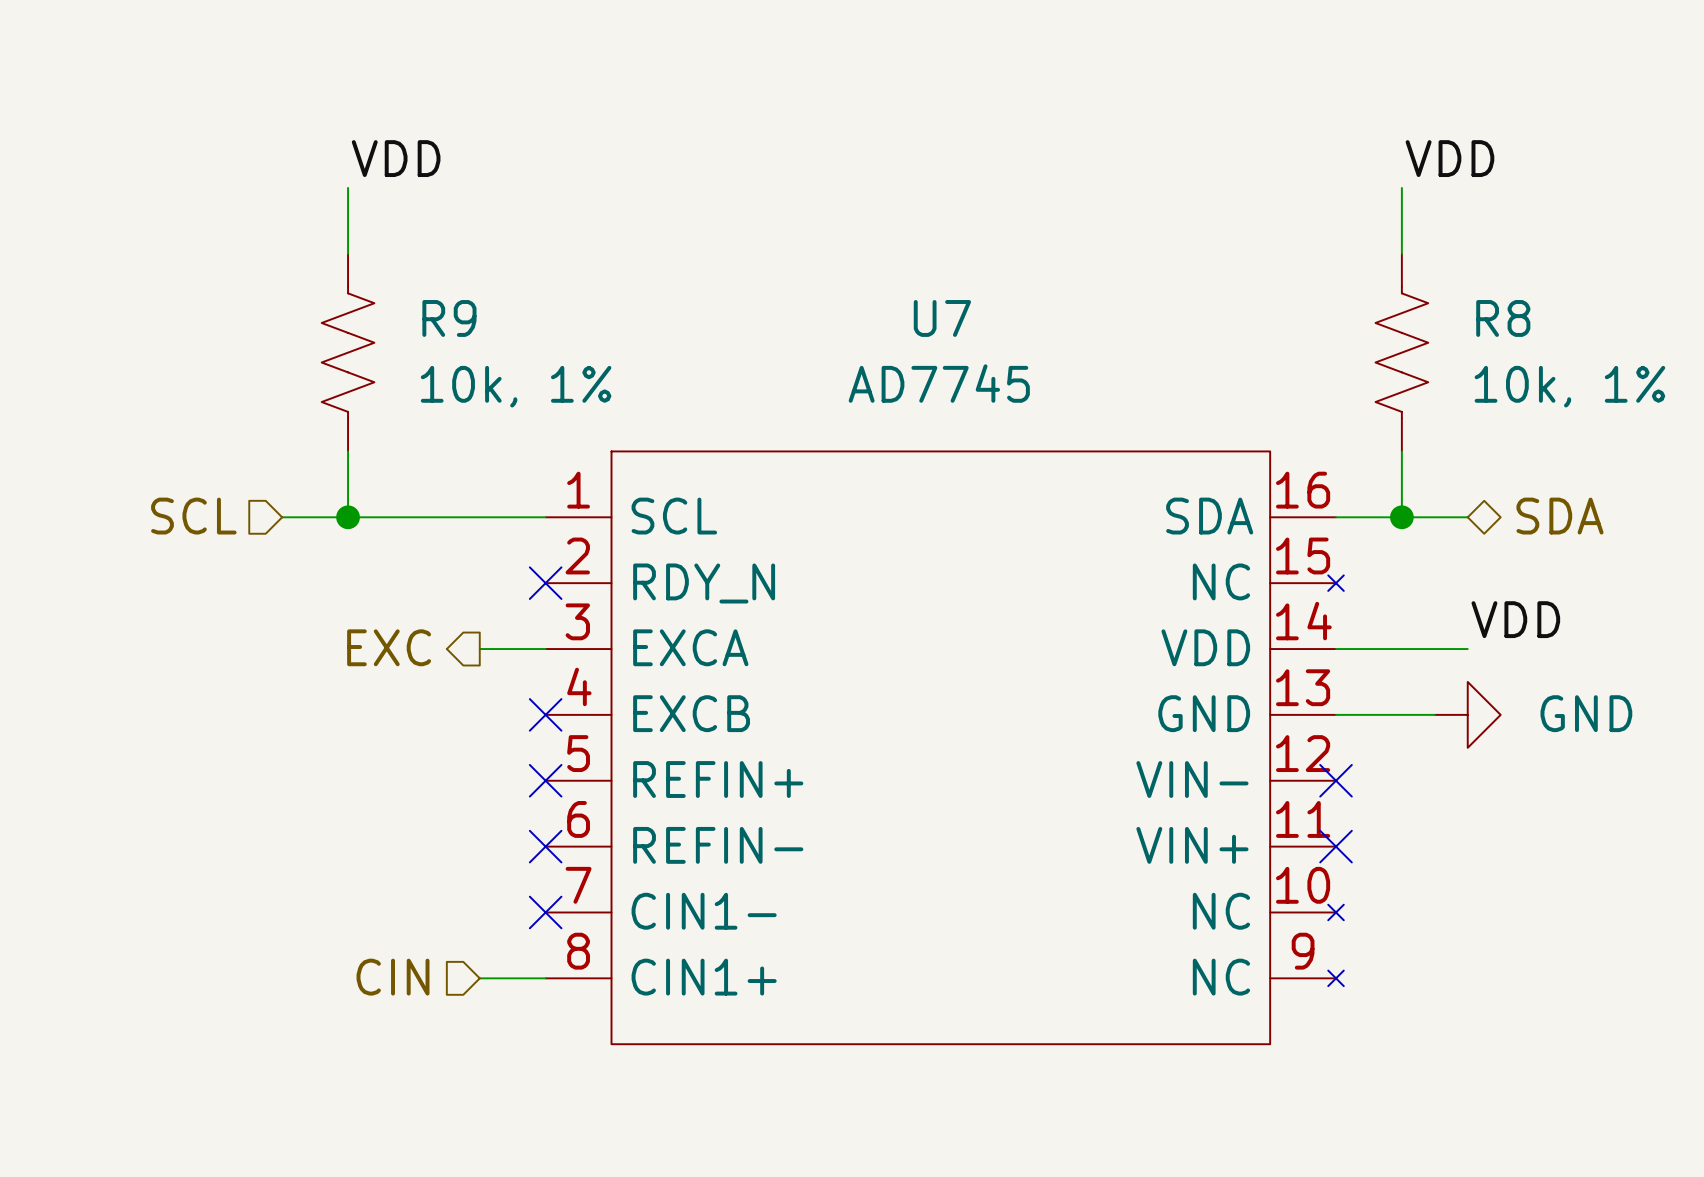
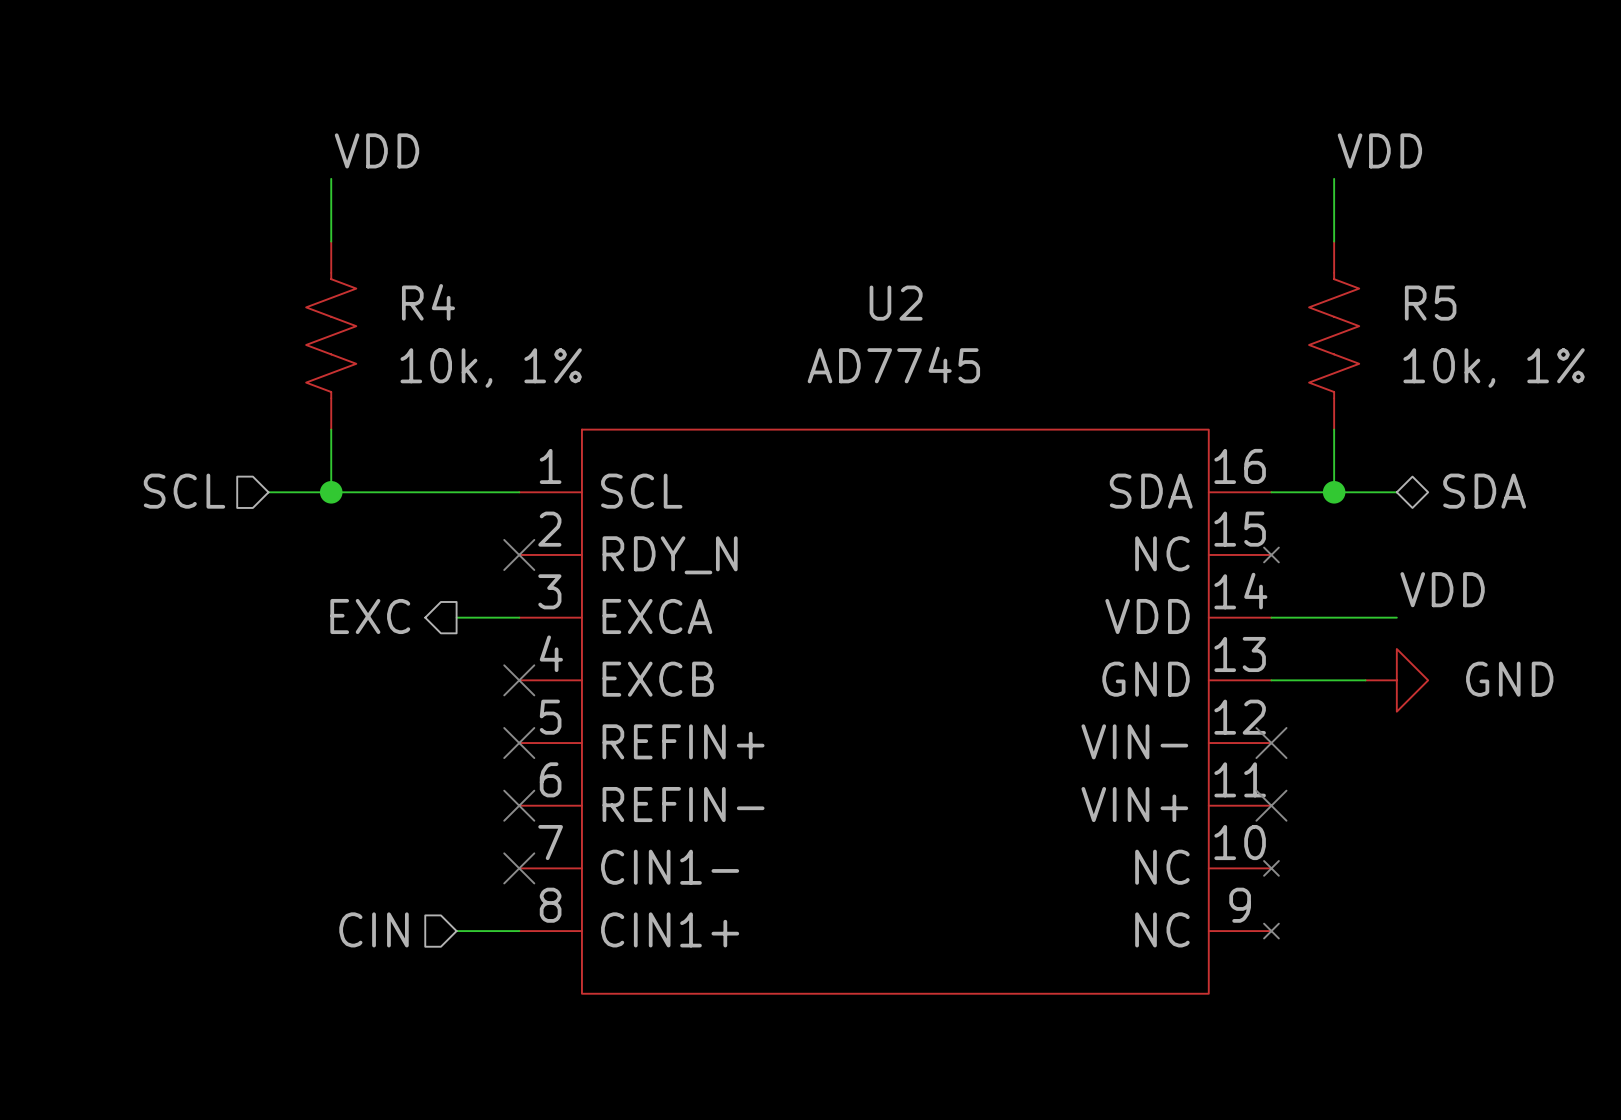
R9 name: R9 (449, 318) -> R4 (428, 302)
U7 name: U7 (942, 318) -> U2 (896, 303)
R8 name: R8 (1503, 318) -> R5 (1430, 303)

